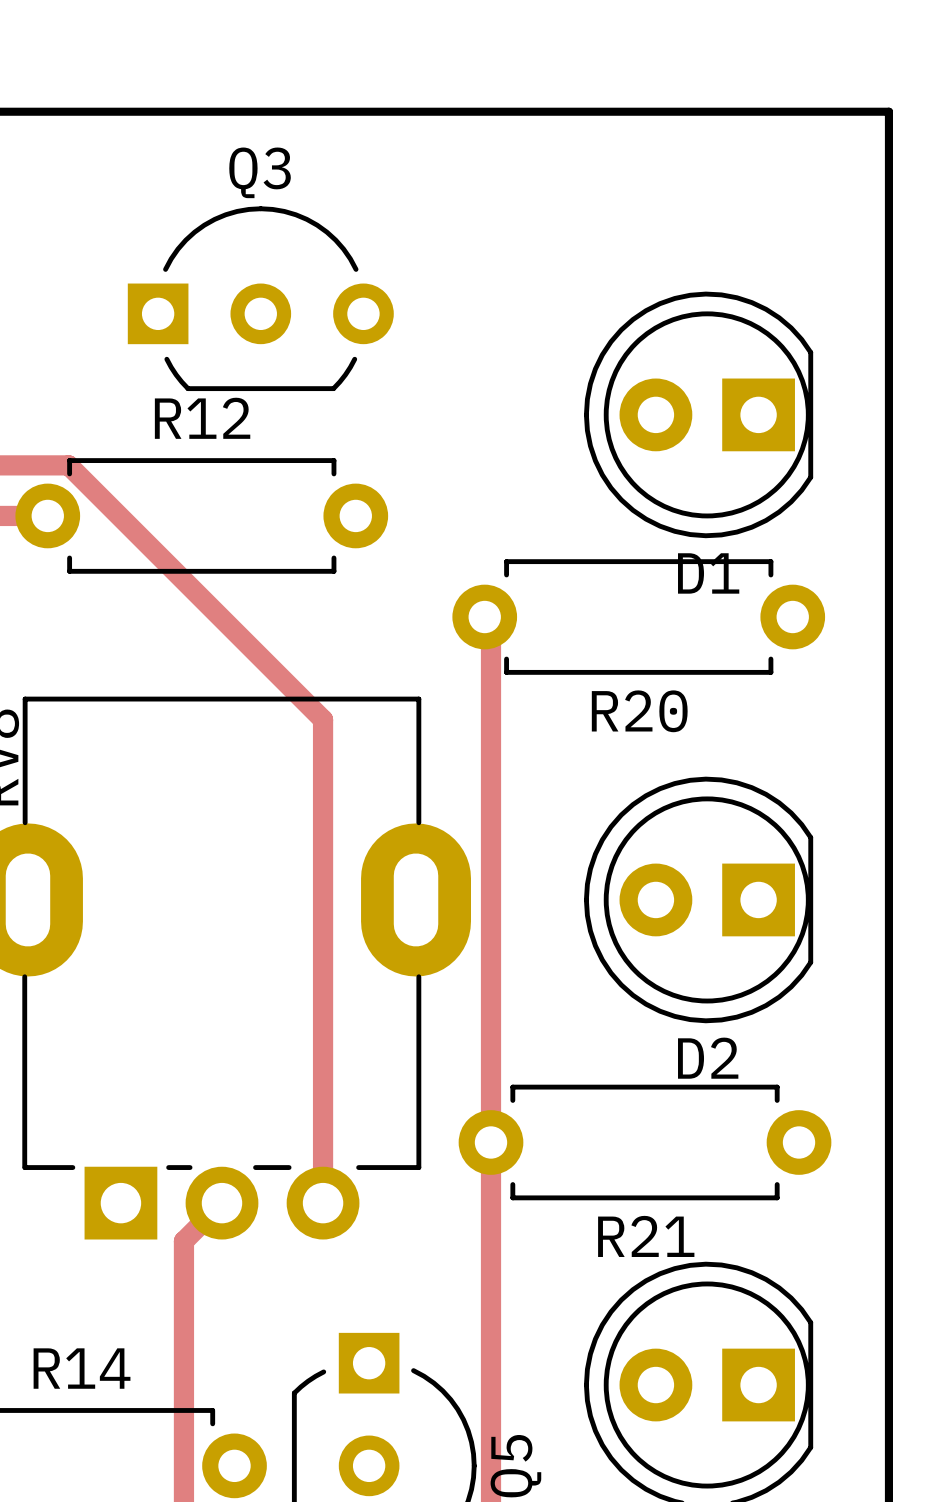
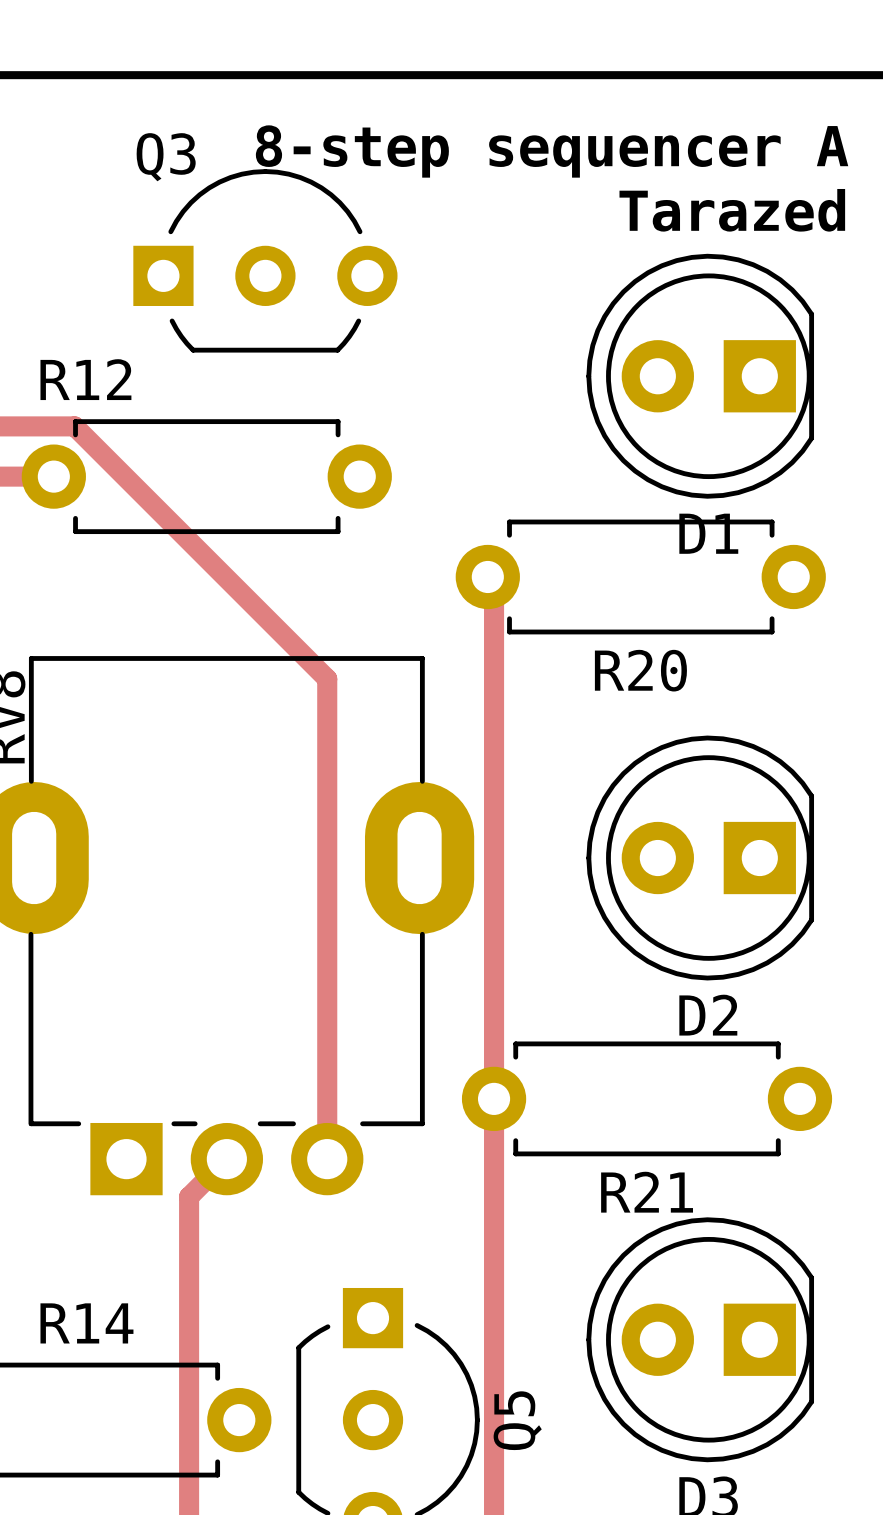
Q3 name position: Q3 (260, 172) -> Q3 (166, 157)
text: none -> 8-step sequencer A (552, 151)
text: none -> Tarazed (732, 210)
R12 name position: R12 (202, 418) -> R12 (85, 379)

